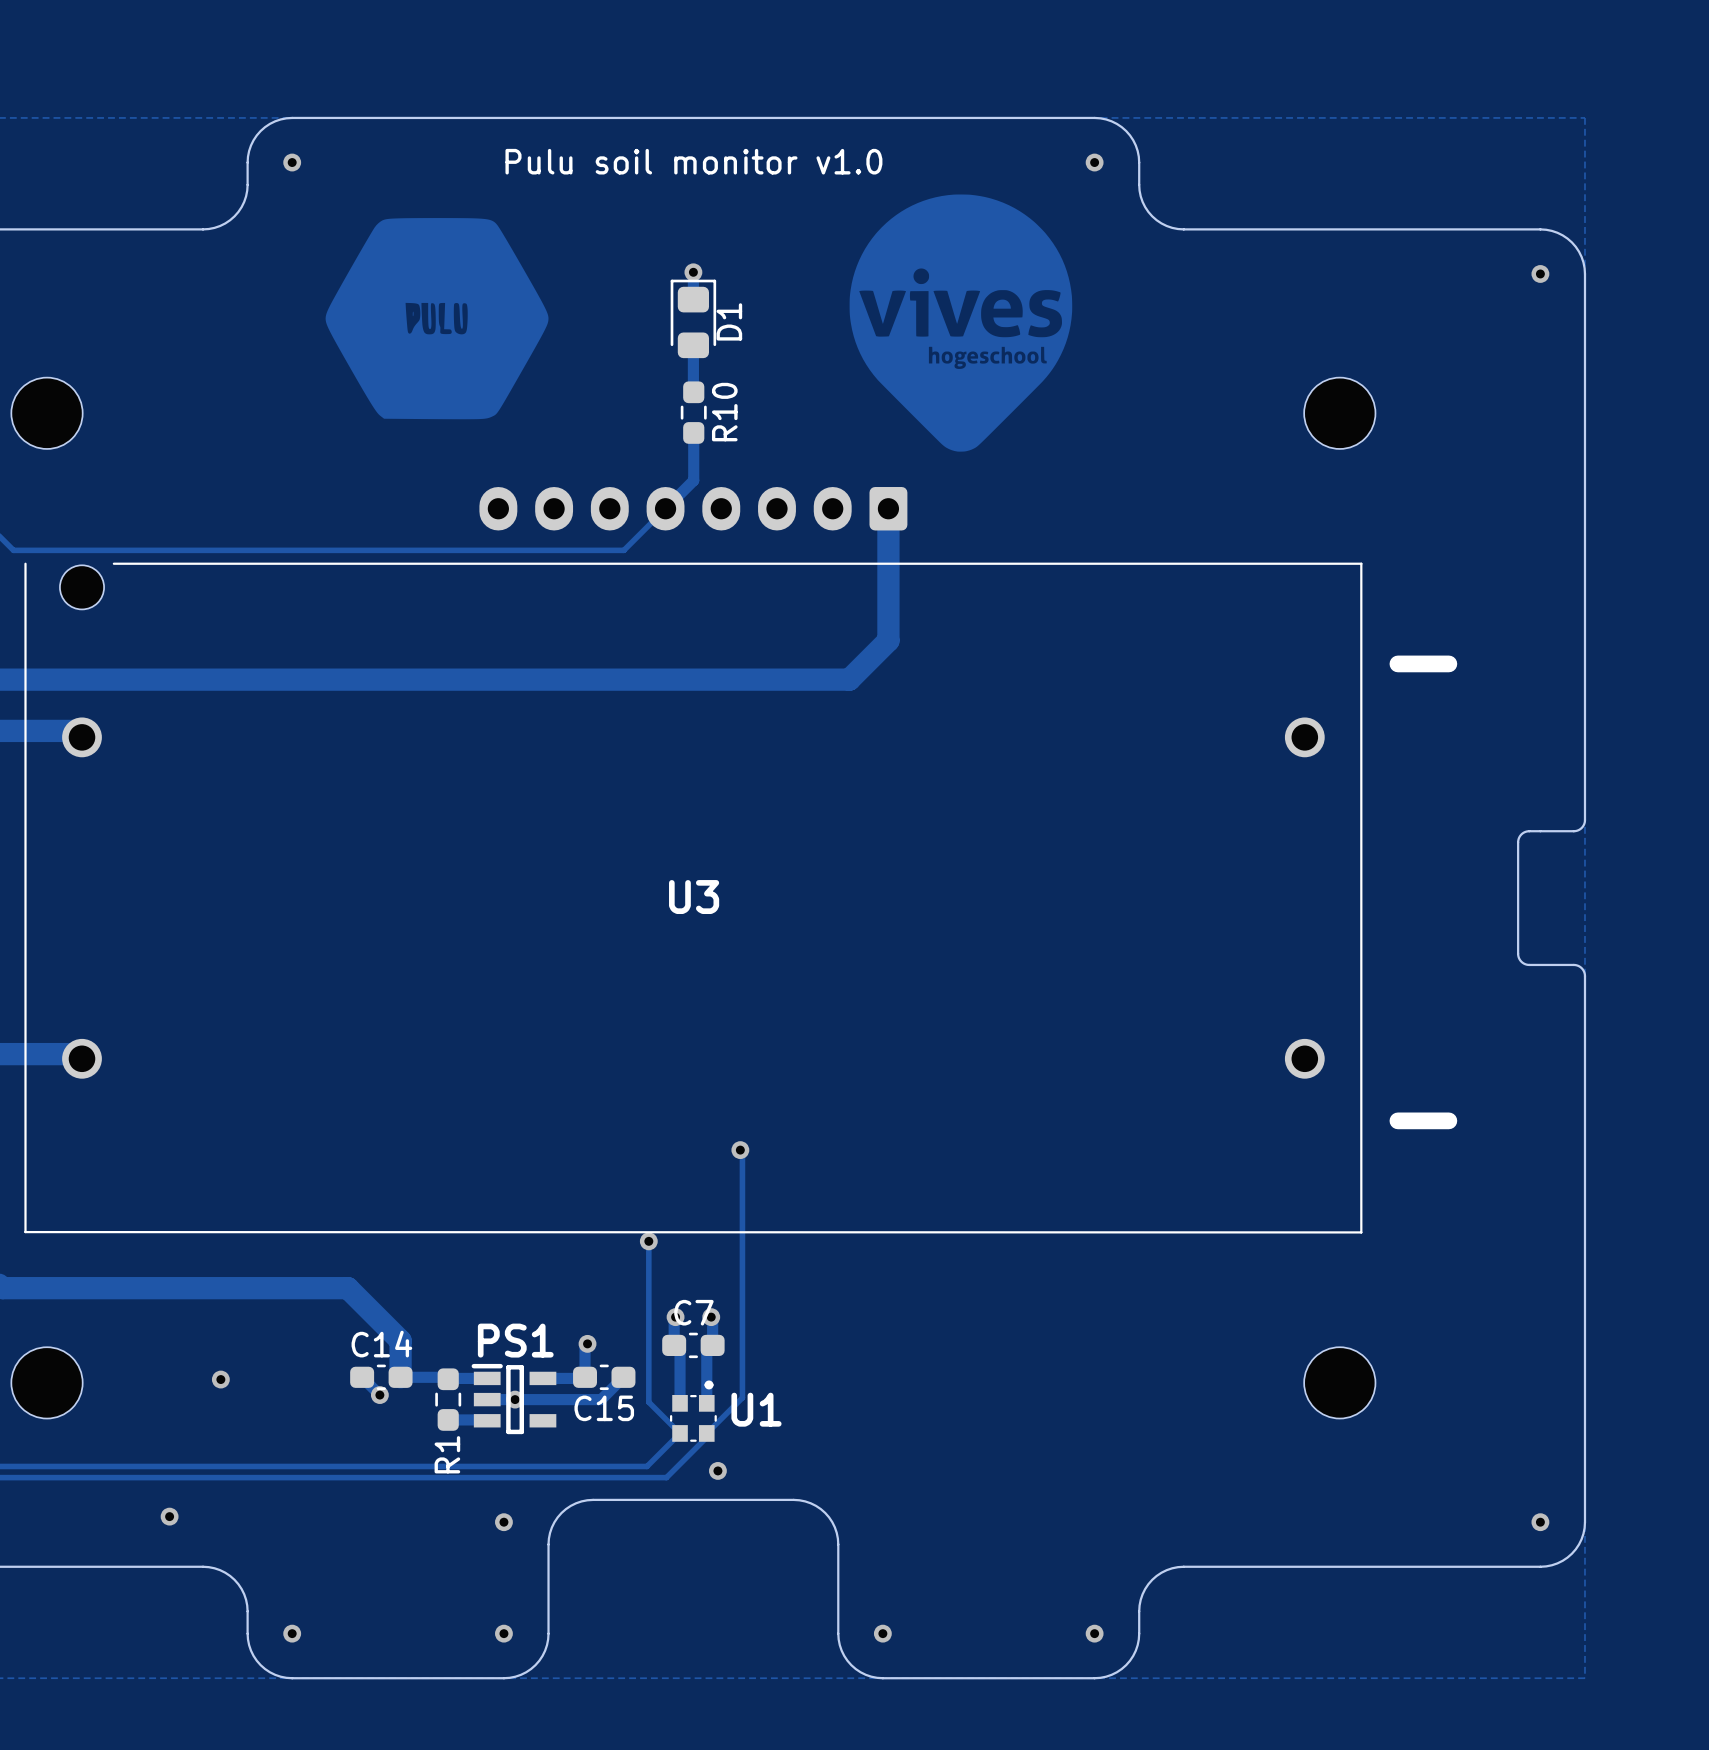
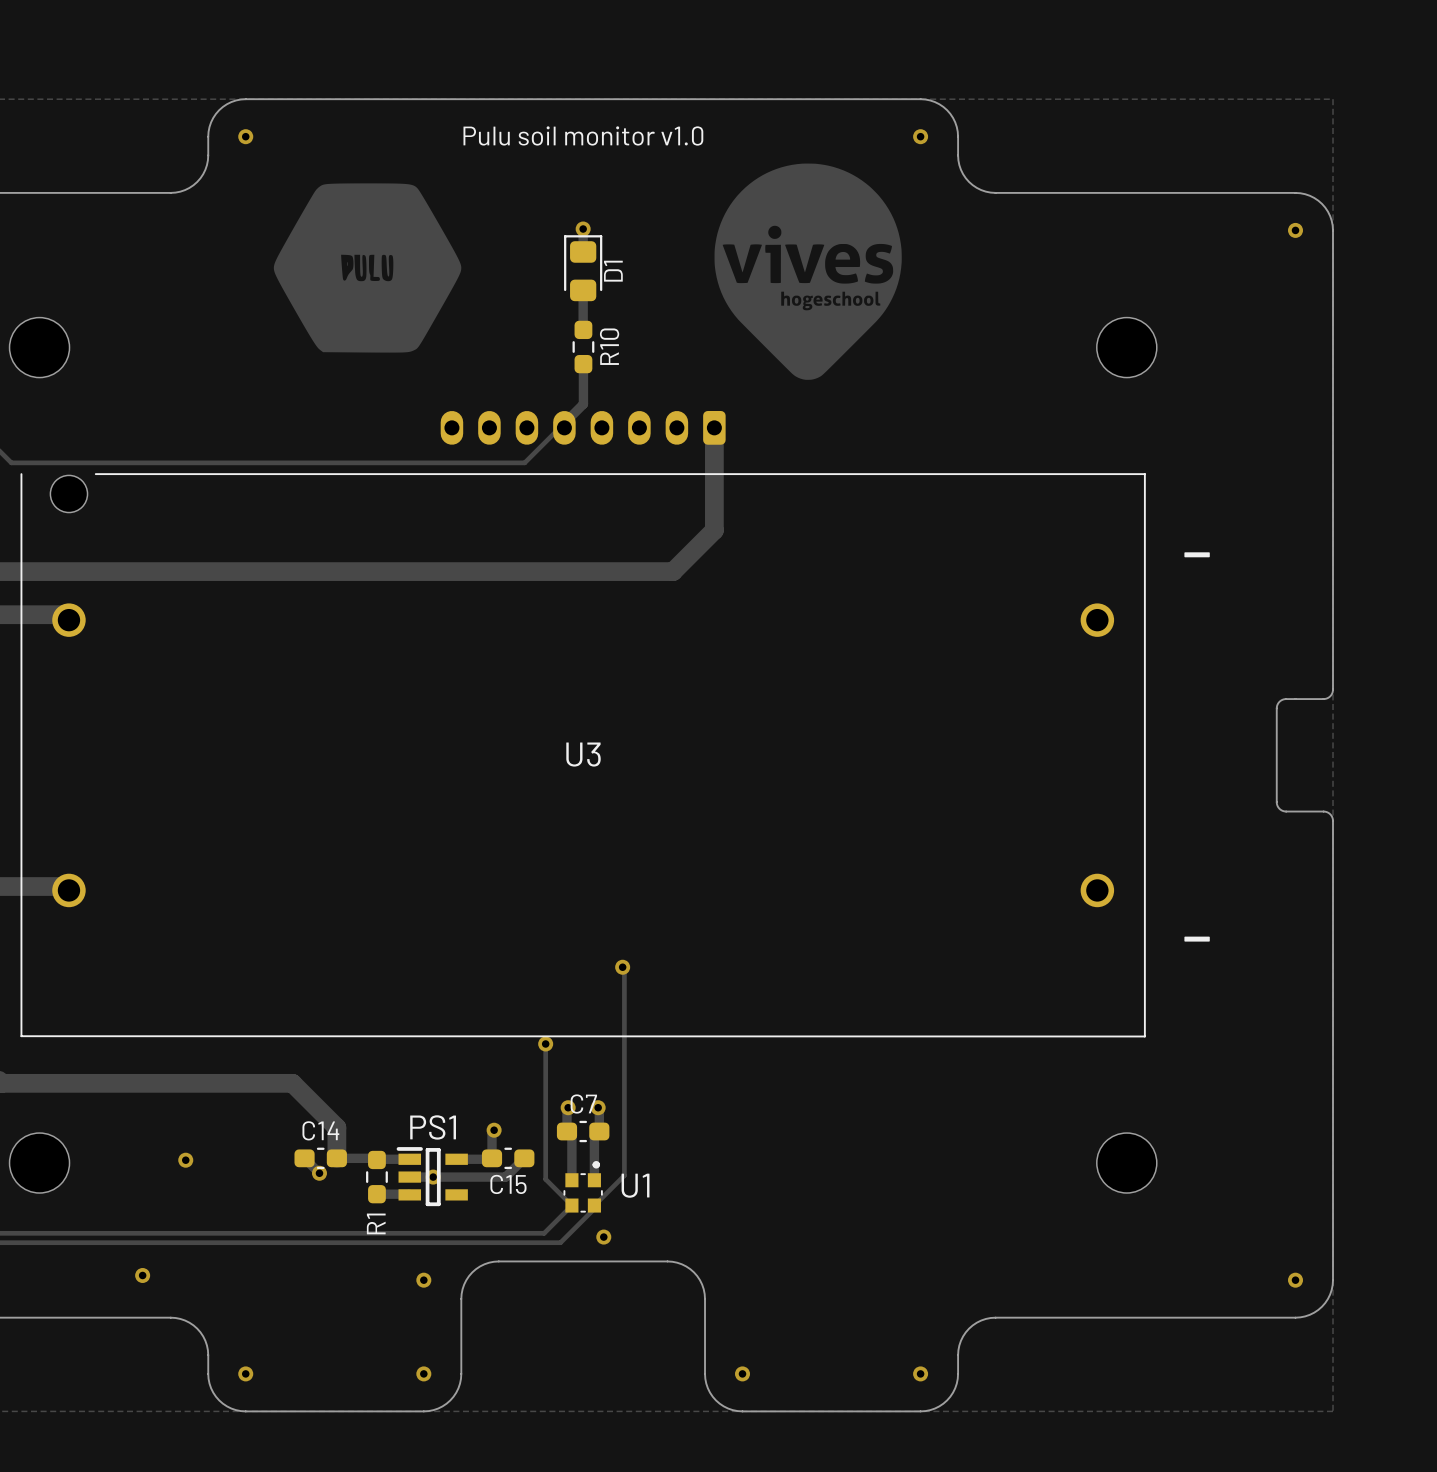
part footprint: [479, 487, 908, 531] -> [440, 410, 726, 445]
track: (888, 508) (888, 640) (849, 679) (800, 679) -> (714, 427) (714, 530) (673, 571)

